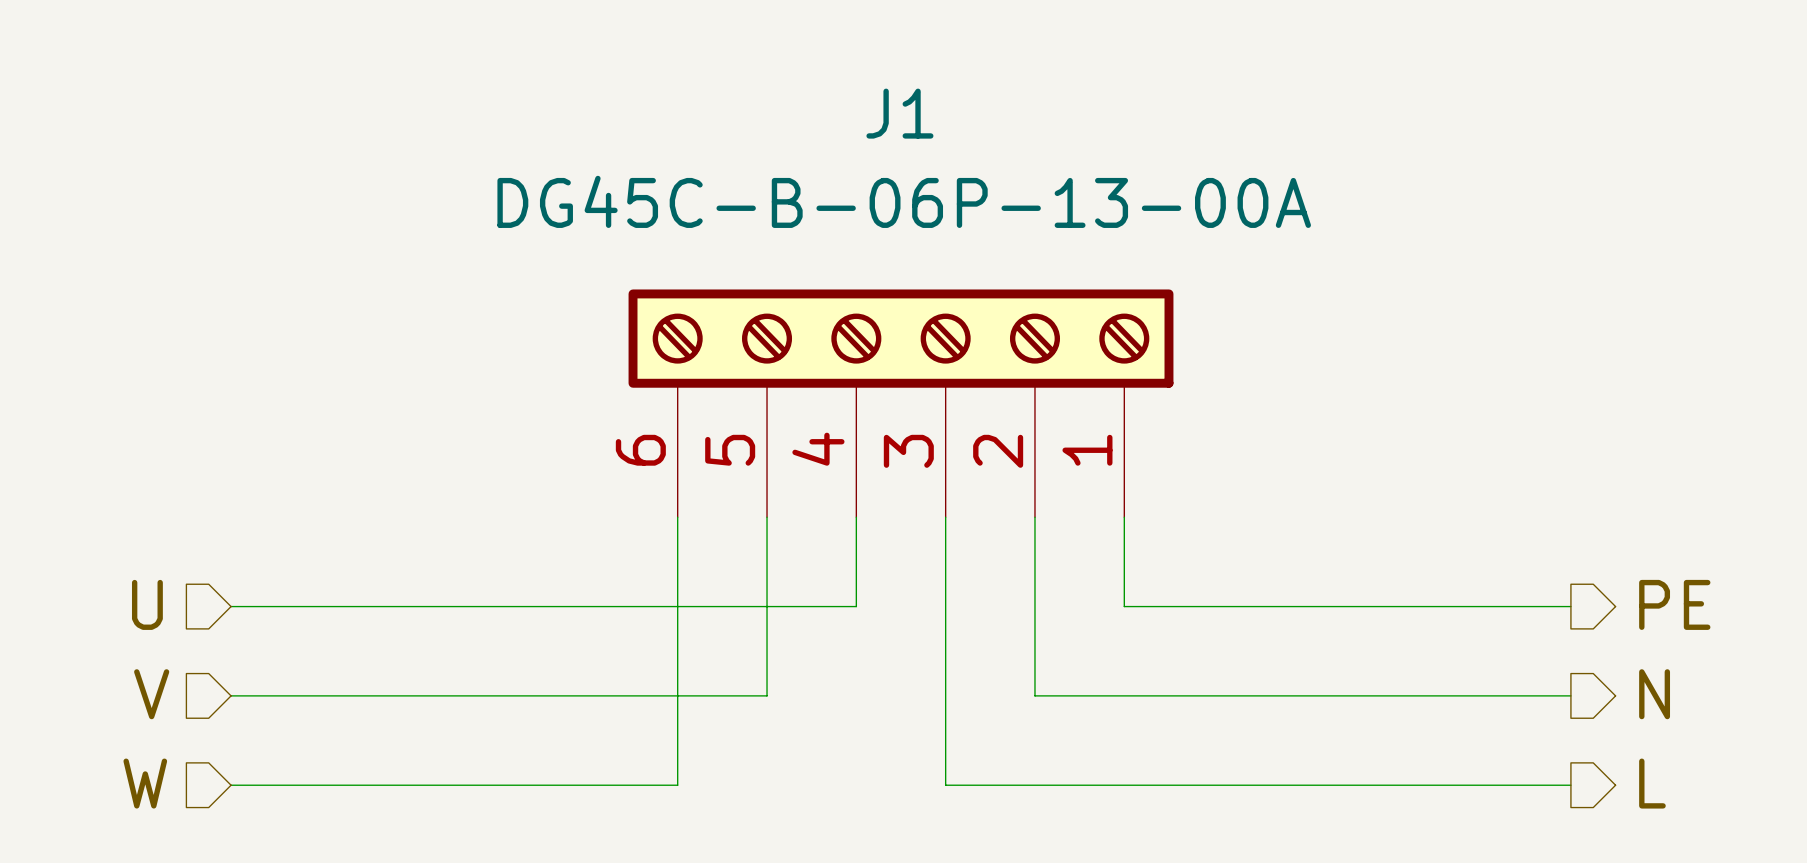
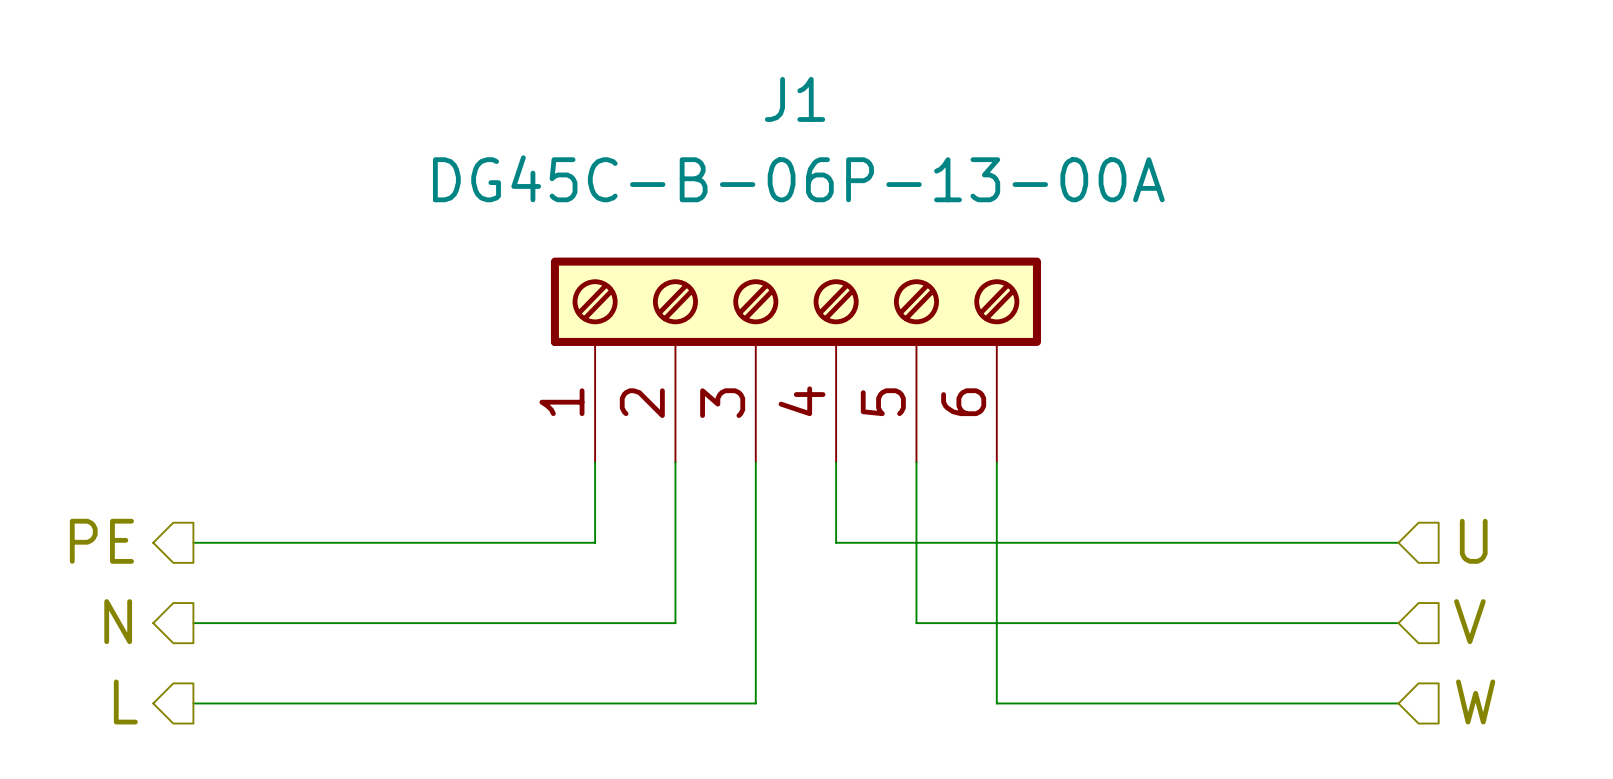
J1 flip: as is (901, 338) -> left-right (795, 301)
hierarchical label shape: input (147, 604) -> output (101, 541)
hierarchical label: U (147, 604) -> PE (101, 541)
hierarchical label shape: output (1674, 604) -> input (1473, 541)
hierarchical label: PE (1674, 604) -> U (1473, 541)
wire: (856, 606) (677, 606) (677, 785) -> (755, 542) (755, 703) (595, 703)
wire: (945, 606) (945, 785) (1124, 785) -> (836, 542) (996, 542) (996, 703)
hierarchical label shape: input (151, 694) -> output (118, 621)
hierarchical label: V (151, 694) -> N (118, 621)
hierarchical label shape: output (1654, 694) -> input (1469, 621)
hierarchical label: N (1654, 694) -> V (1469, 621)
hierarchical label shape: input (145, 783) -> output (125, 701)
hierarchical label: W (145, 783) -> L (125, 701)
hierarchical label shape: output (1652, 783) -> input (1475, 701)
hierarchical label: L (1652, 783) -> W (1475, 701)

